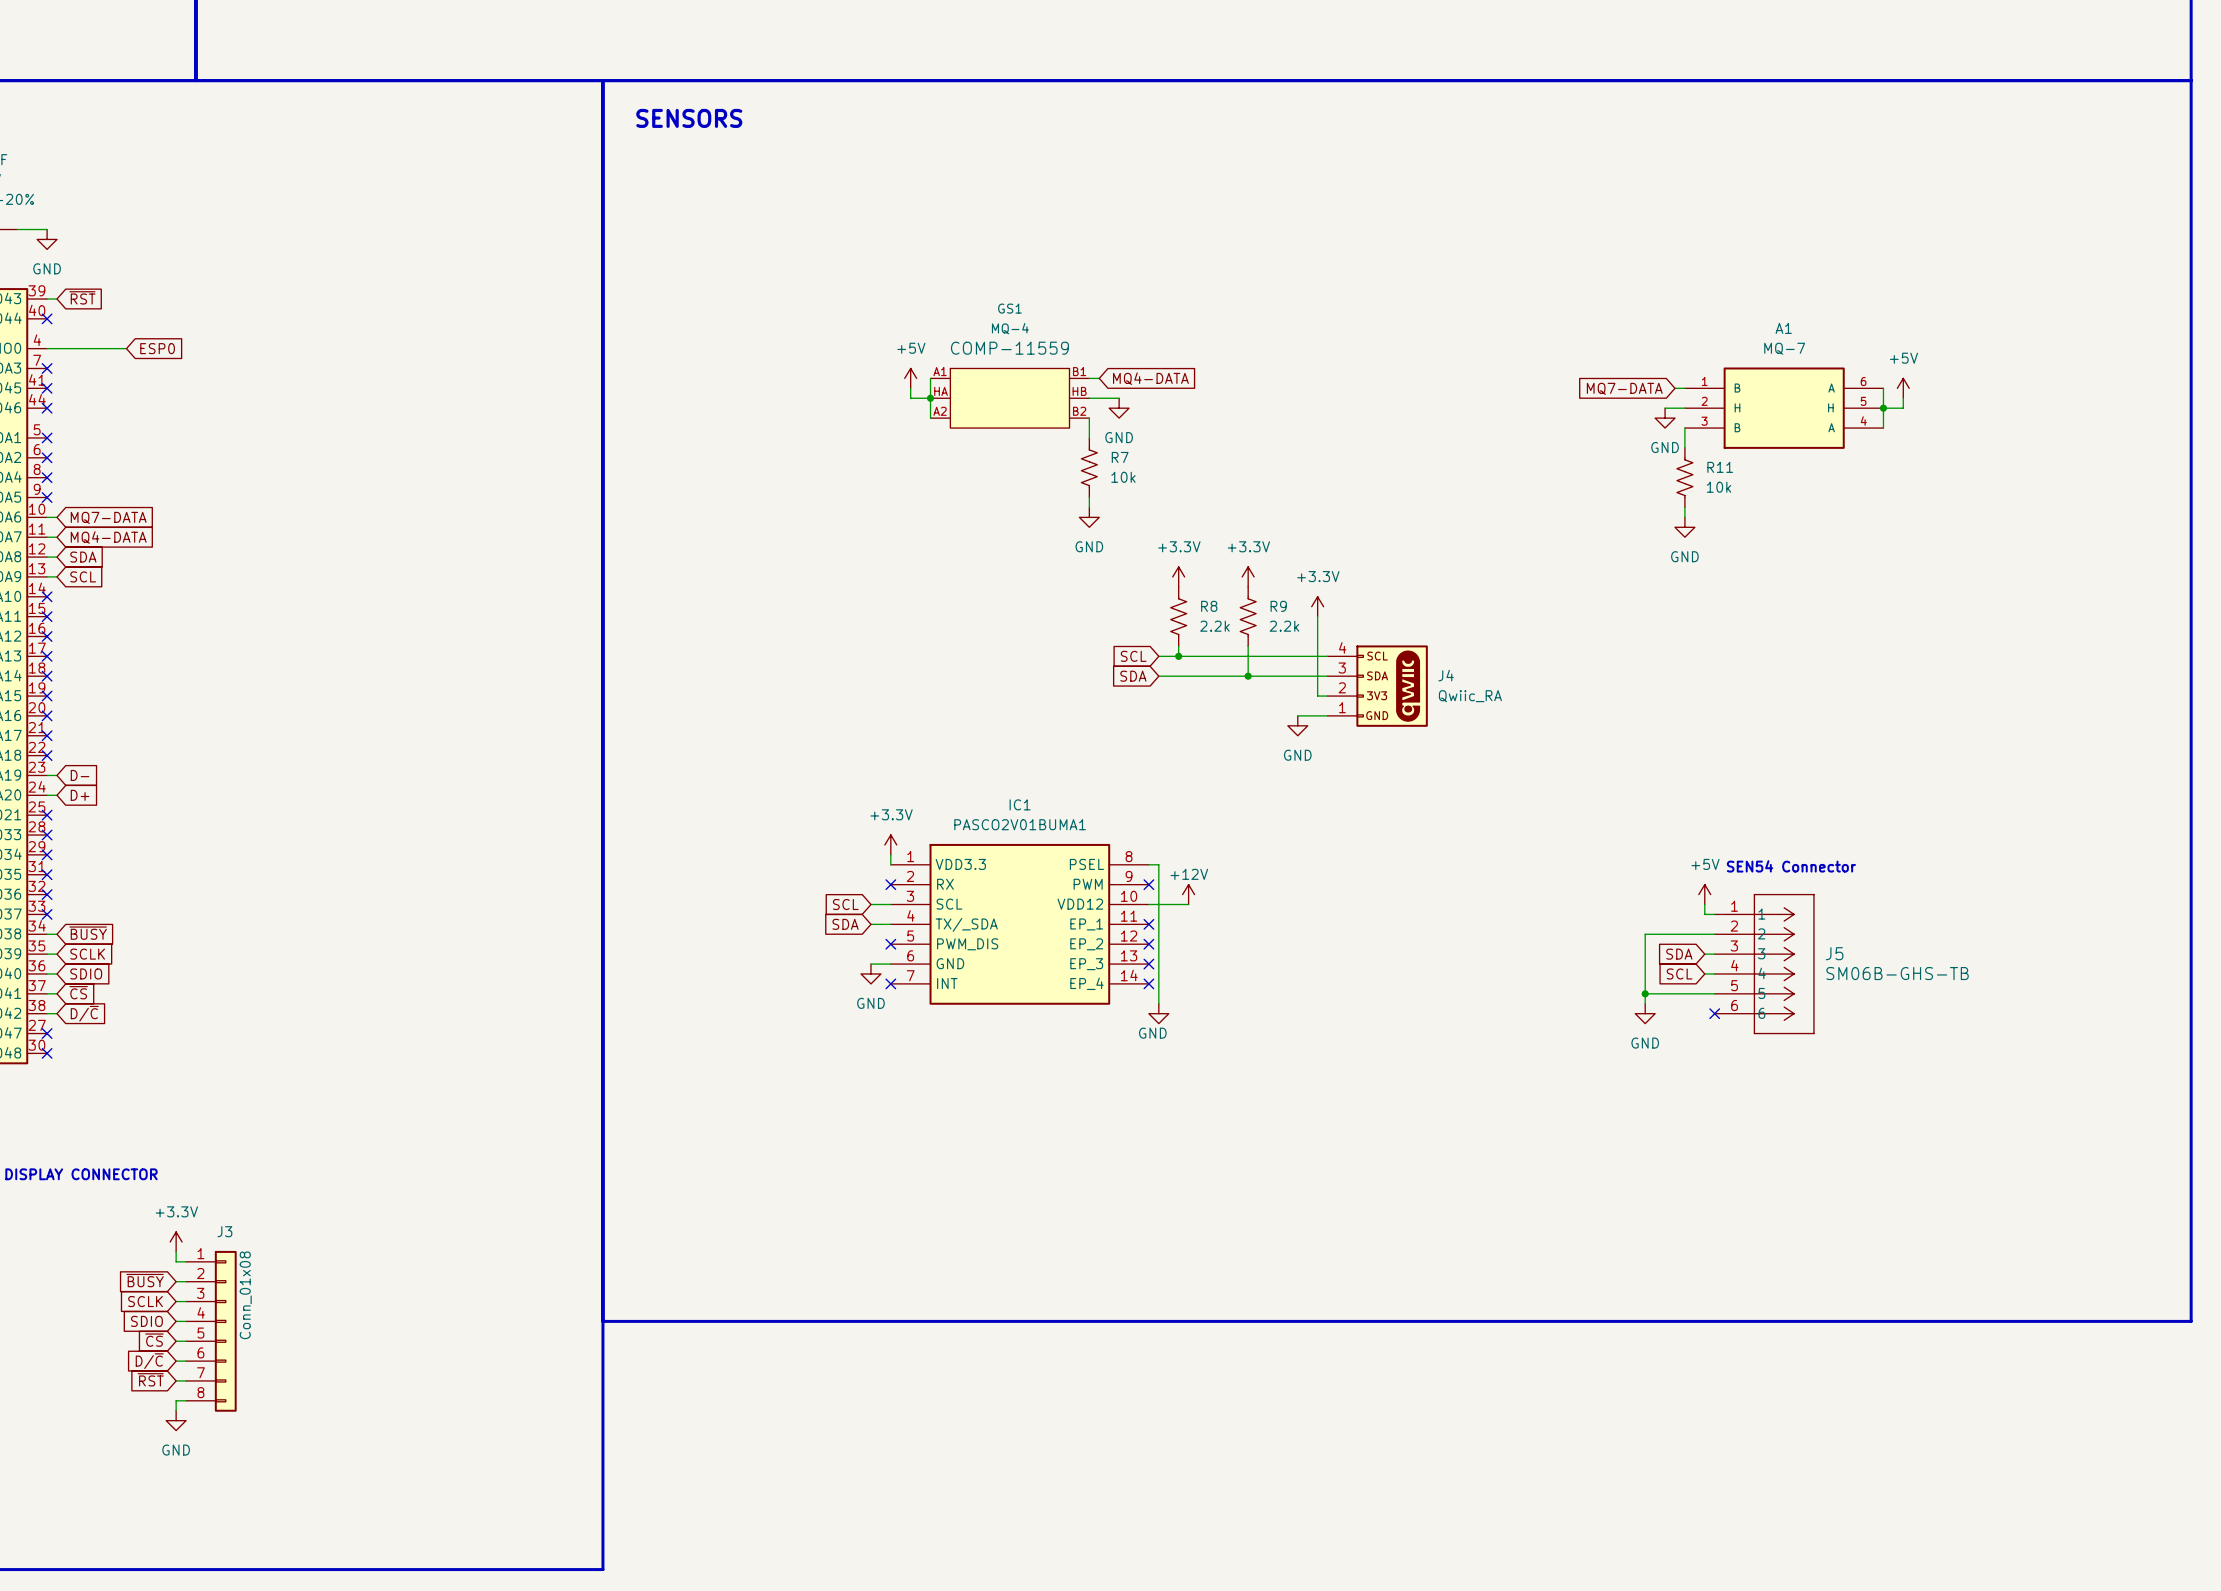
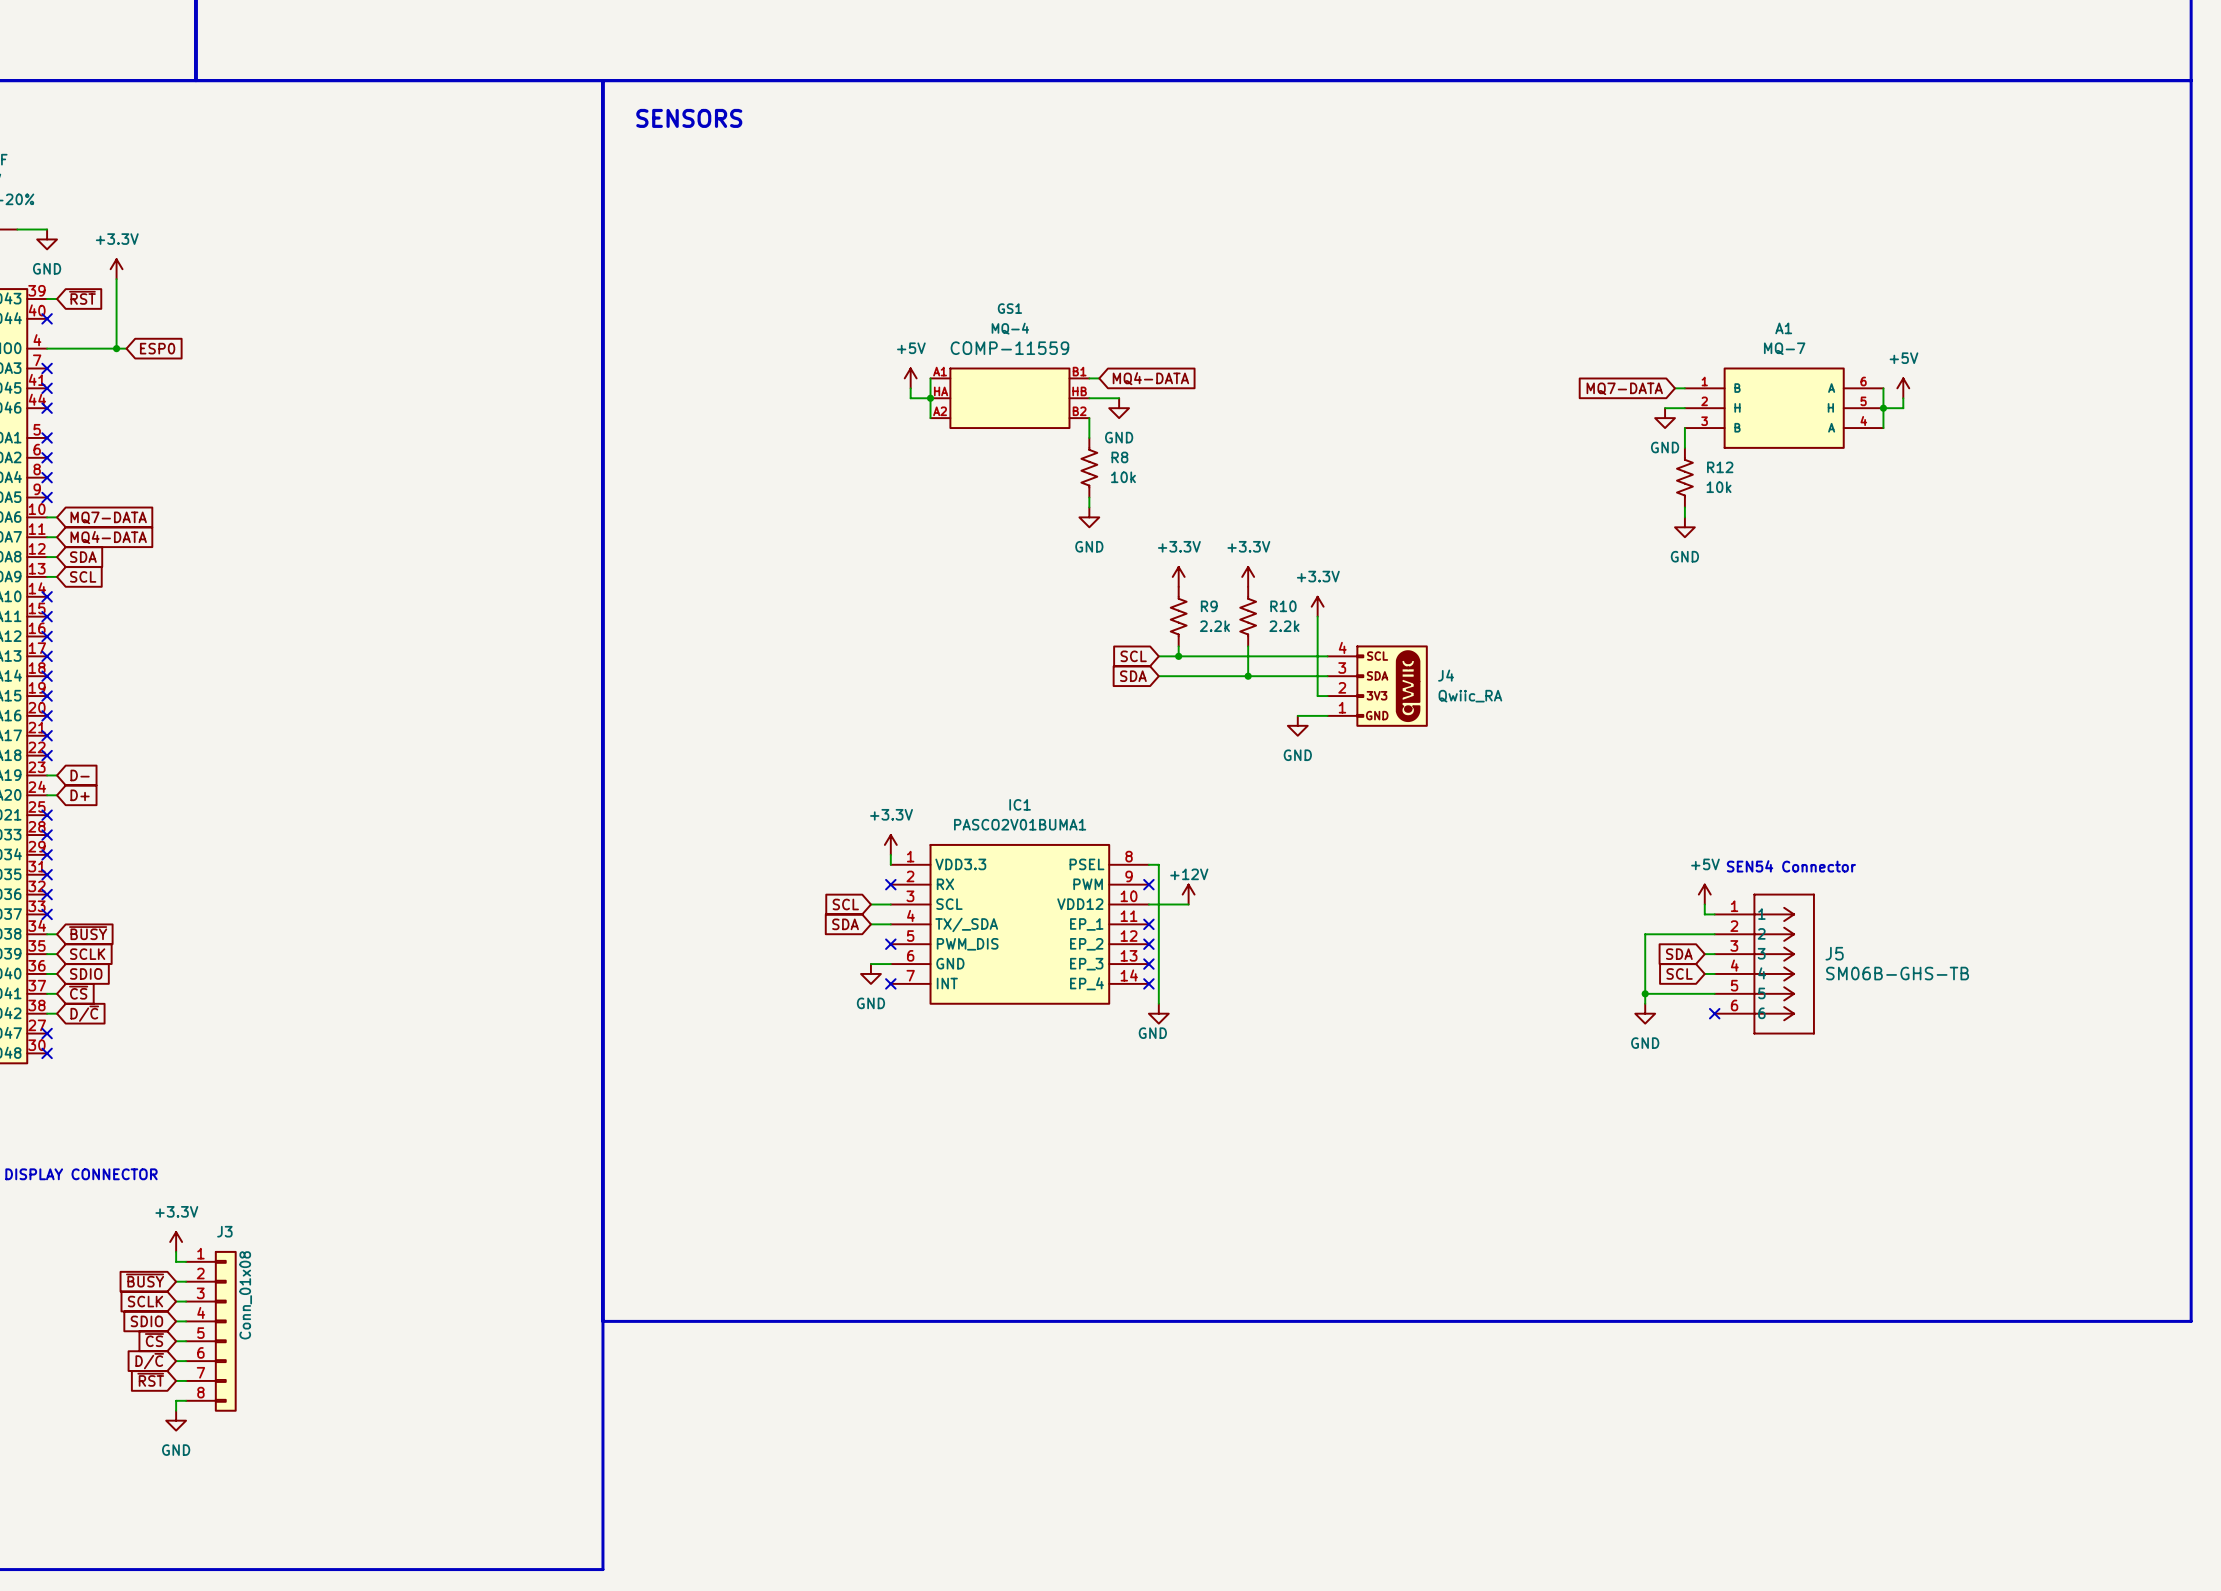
power symbol: none -> +3.3V (116, 269)
wire: none -> (116, 279) (116, 348)
junction: none -> (116, 348)
R7 name: R7 (1120, 457) -> R8 (1119, 457)
R11 name: R11 (1720, 467) -> R12 (1720, 467)
R8 name: R8 (1209, 606) -> R9 (1209, 606)
R9 name: R9 (1278, 606) -> R10 (1283, 606)

